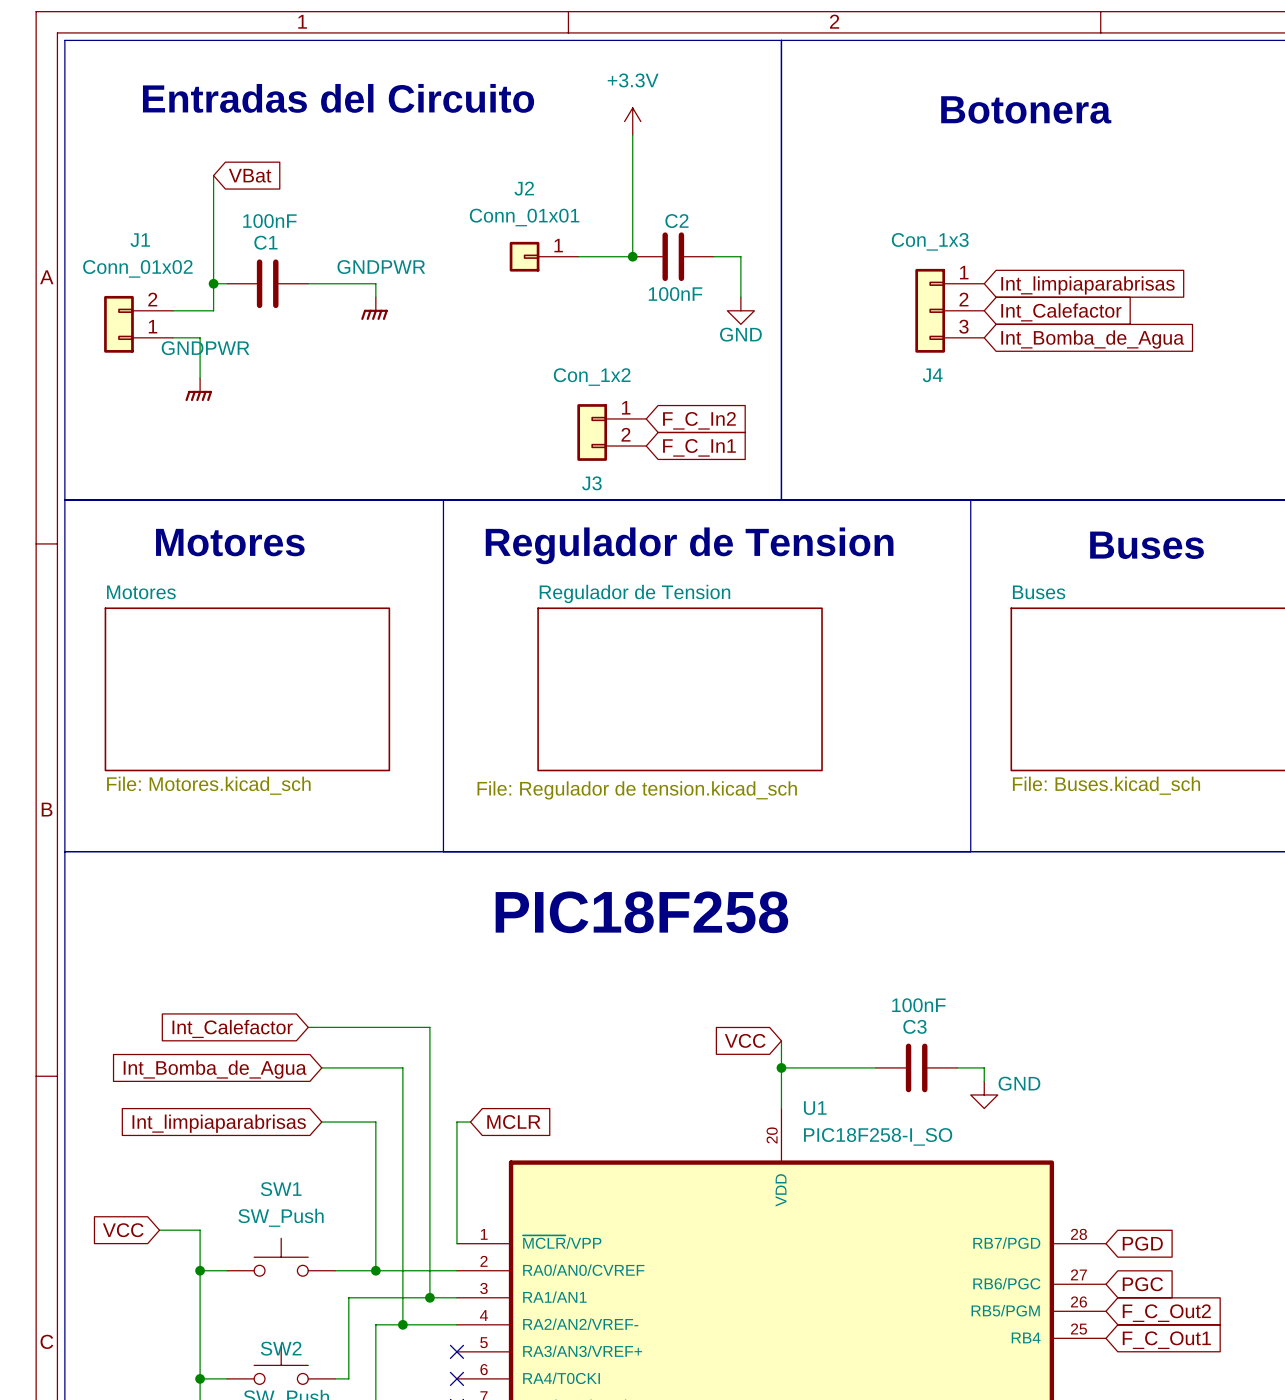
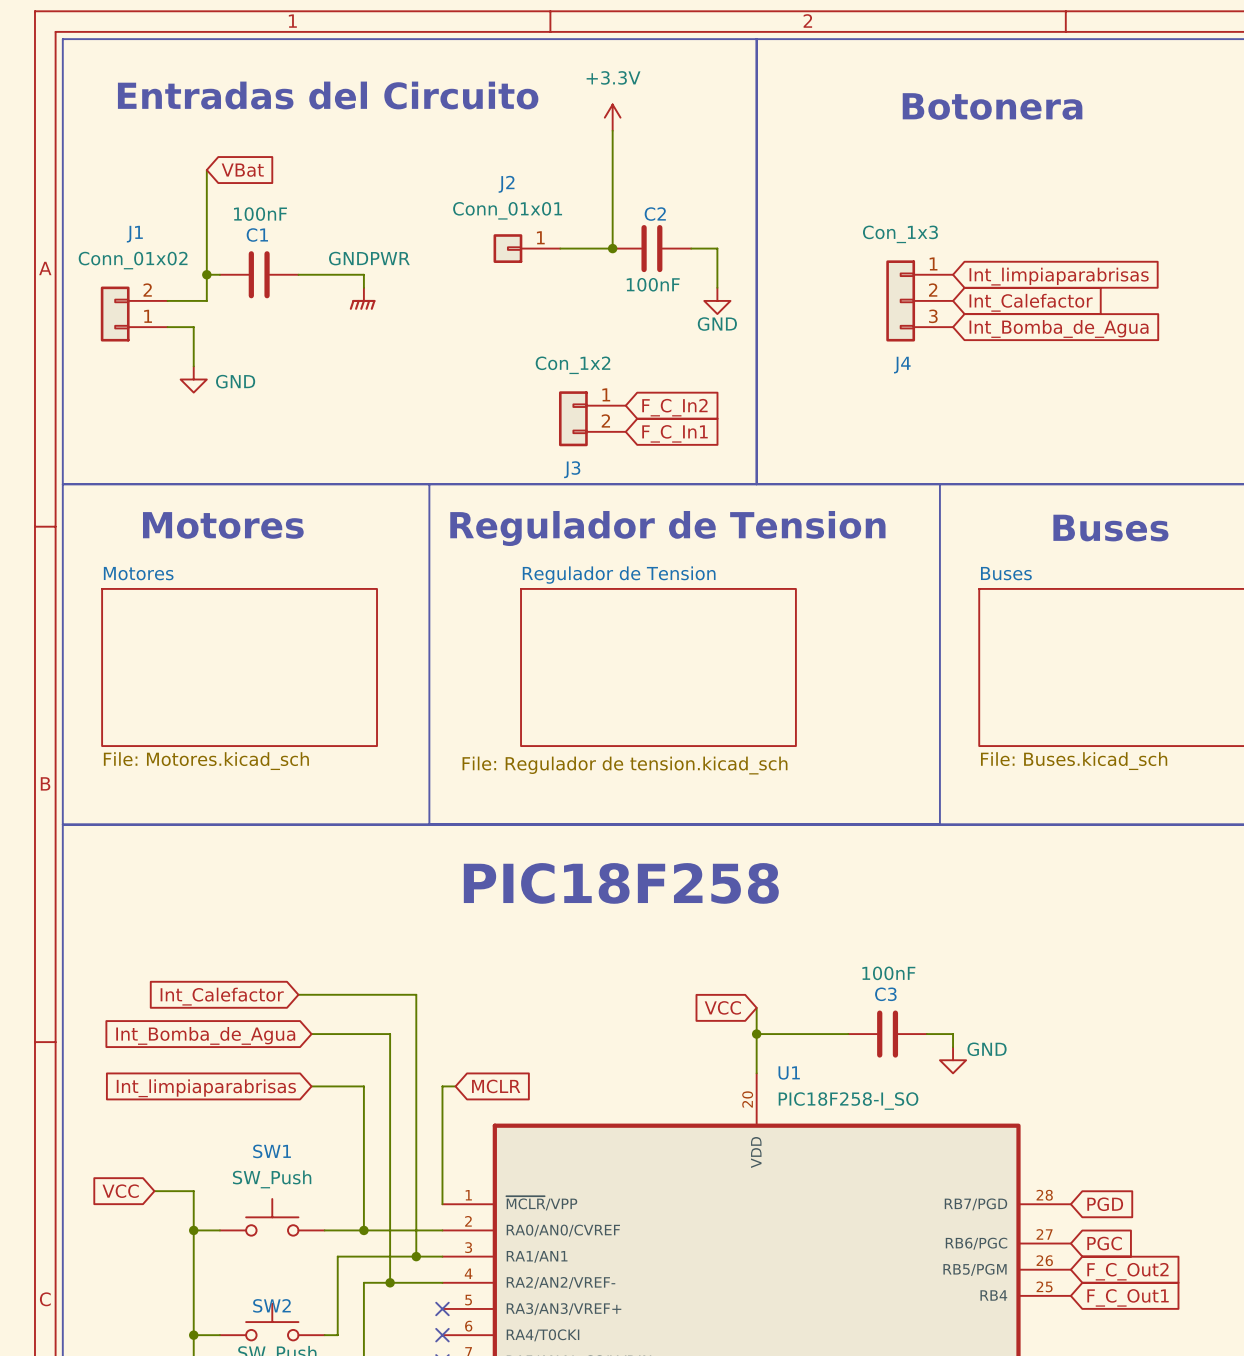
power symbol: GNDPWR (198, 389) -> GND (193, 379)

